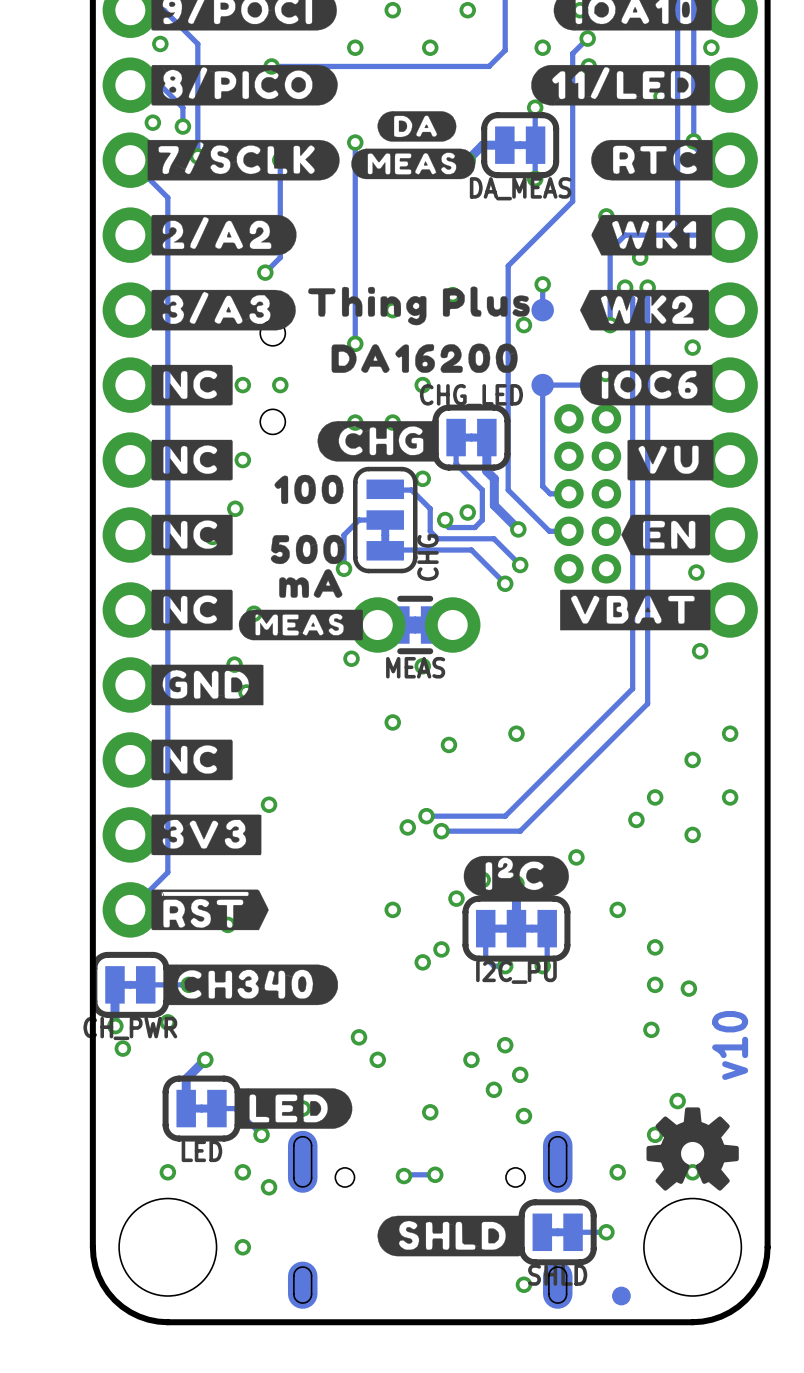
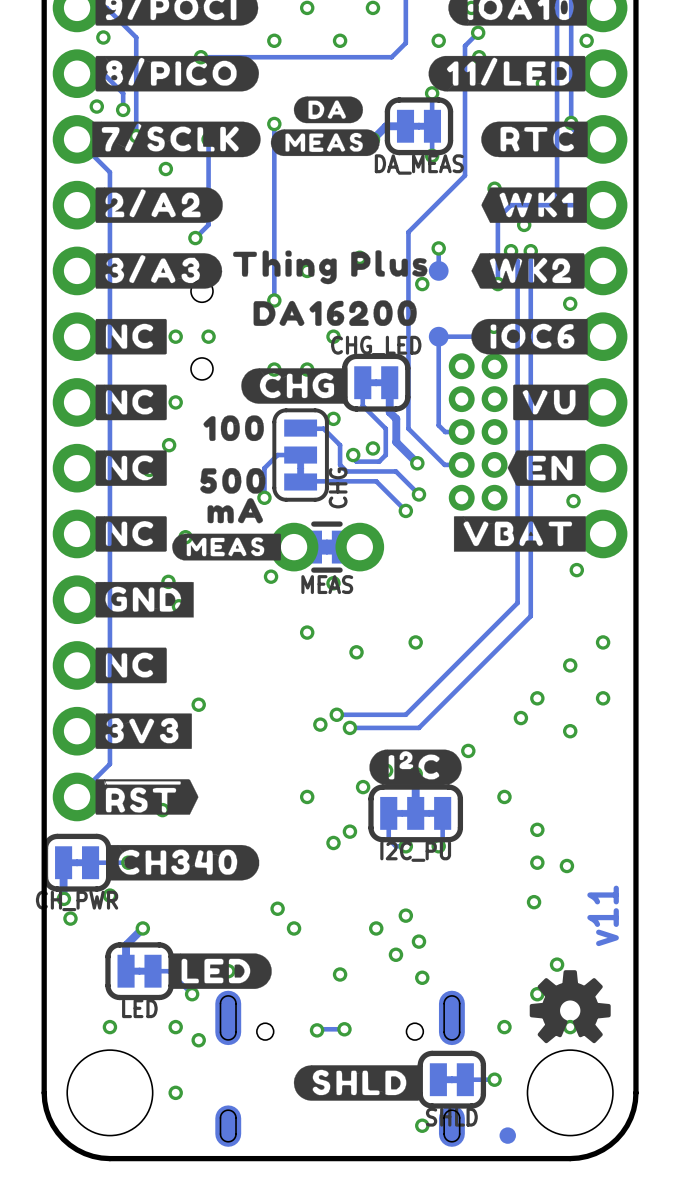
via: none -> (165, 169)
text: v10 (730, 1045) -> v11 (603, 915)

